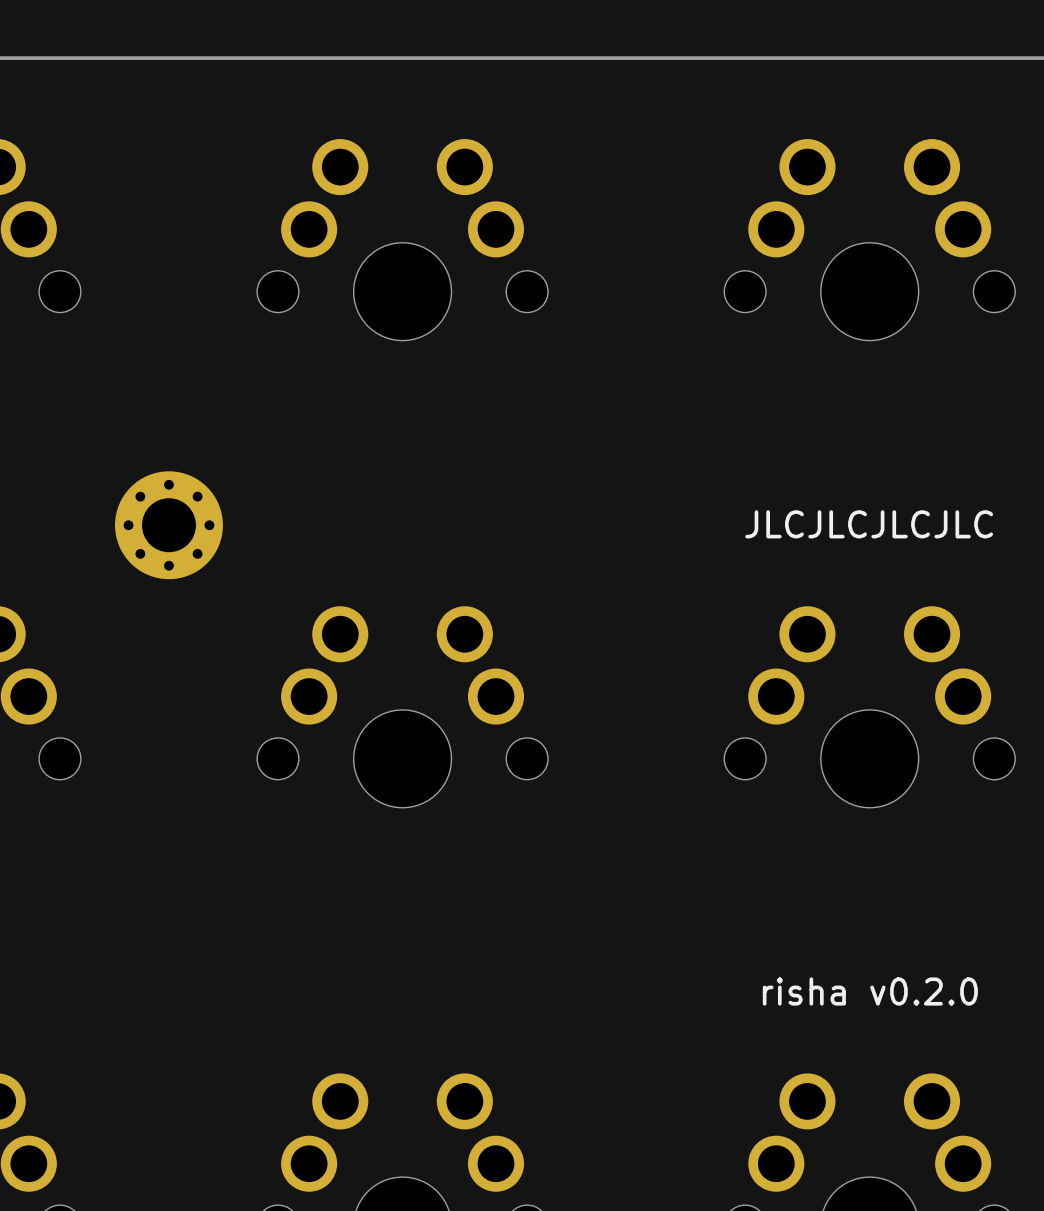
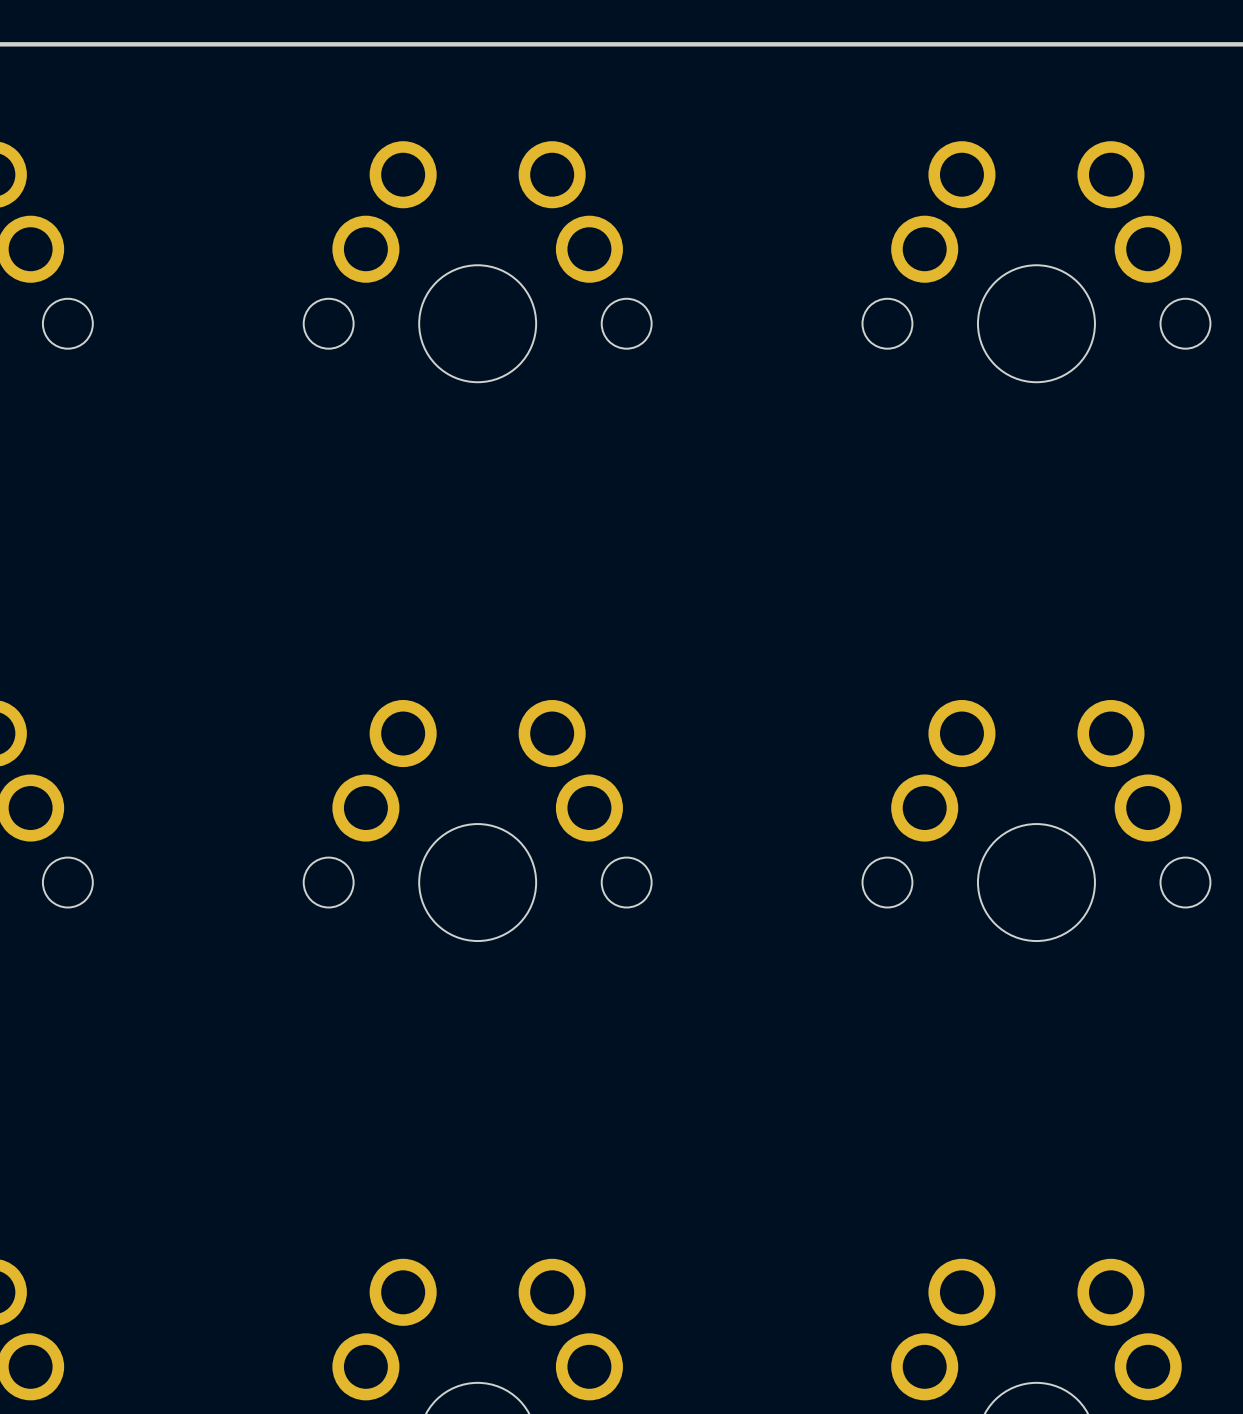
text: JLCJLCJLCJLC (869, 524) -> none
part: (168, 525) -> none
text: risha v0.2.0 (870, 991) -> none

